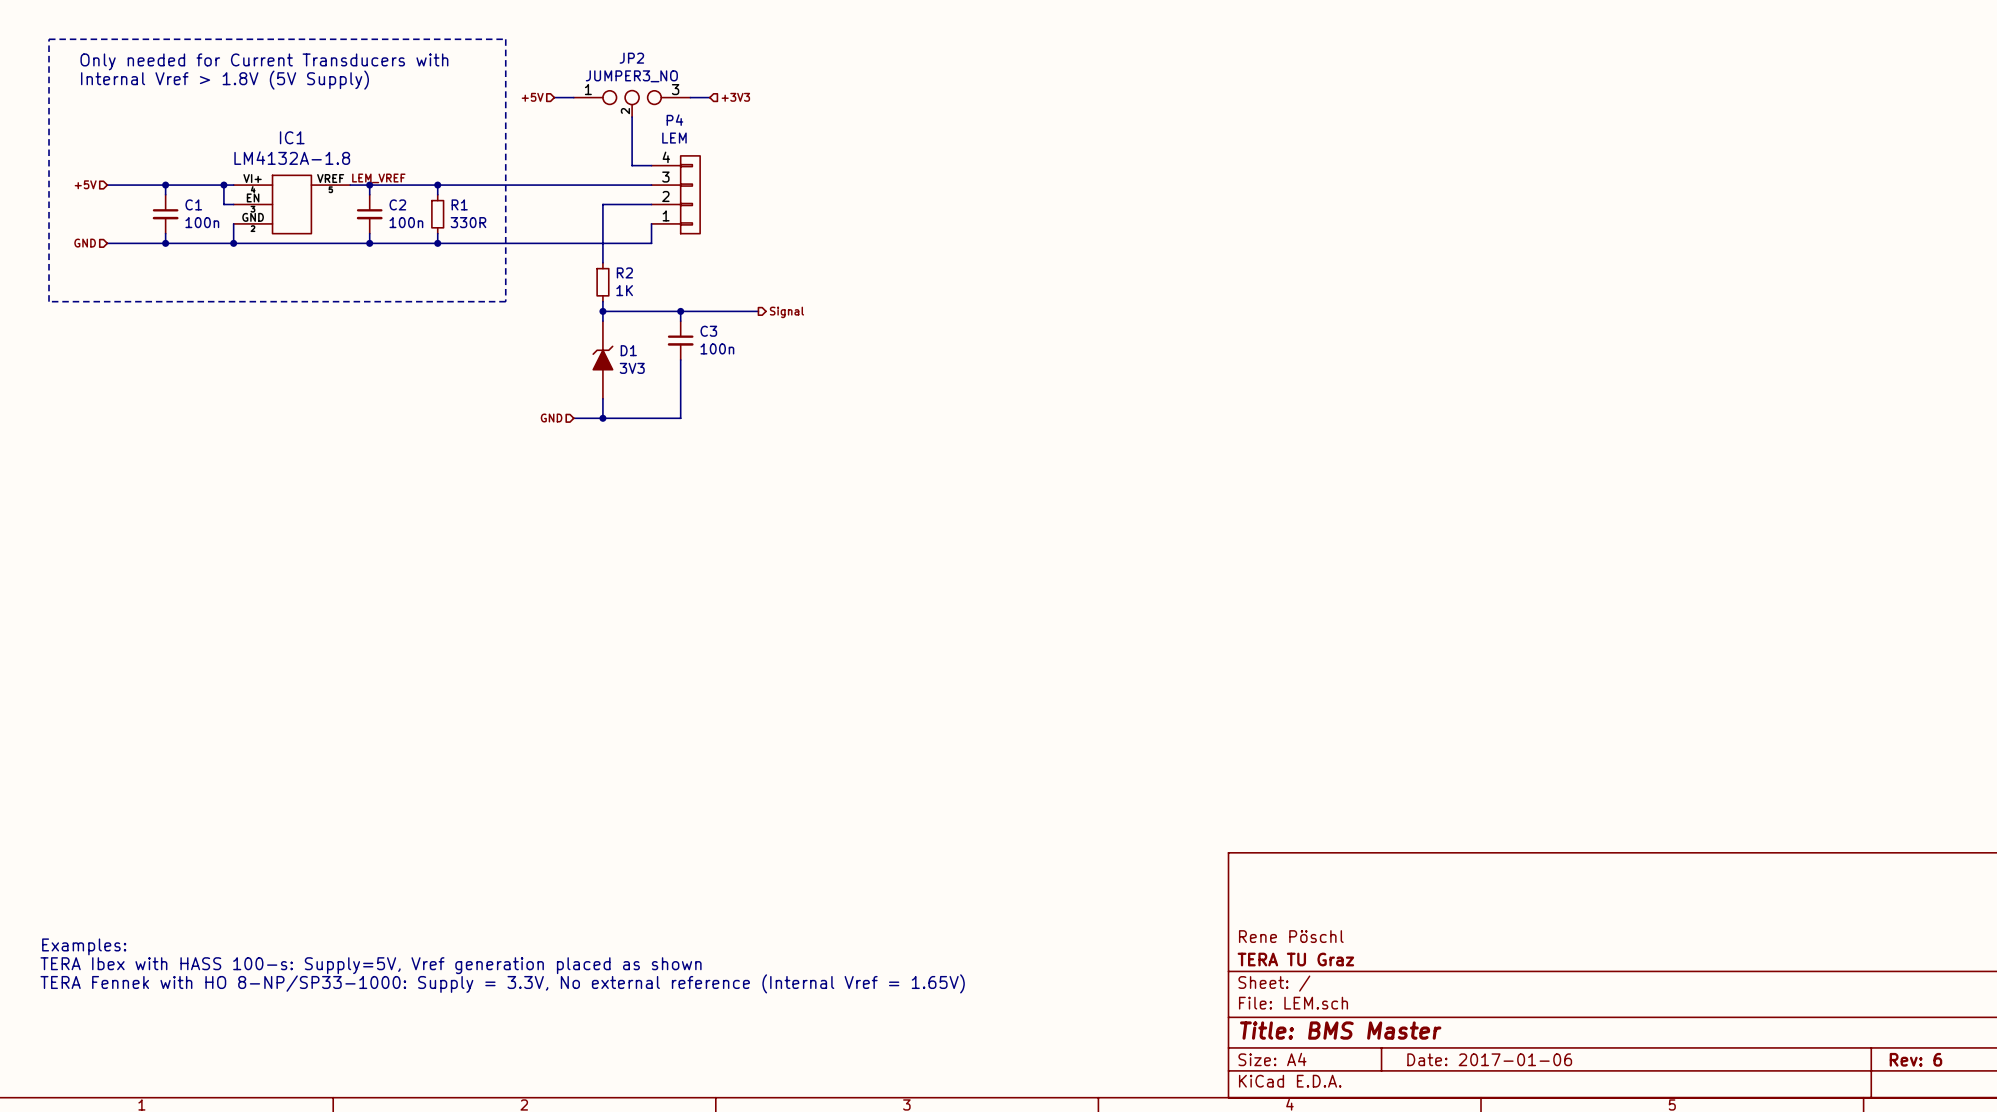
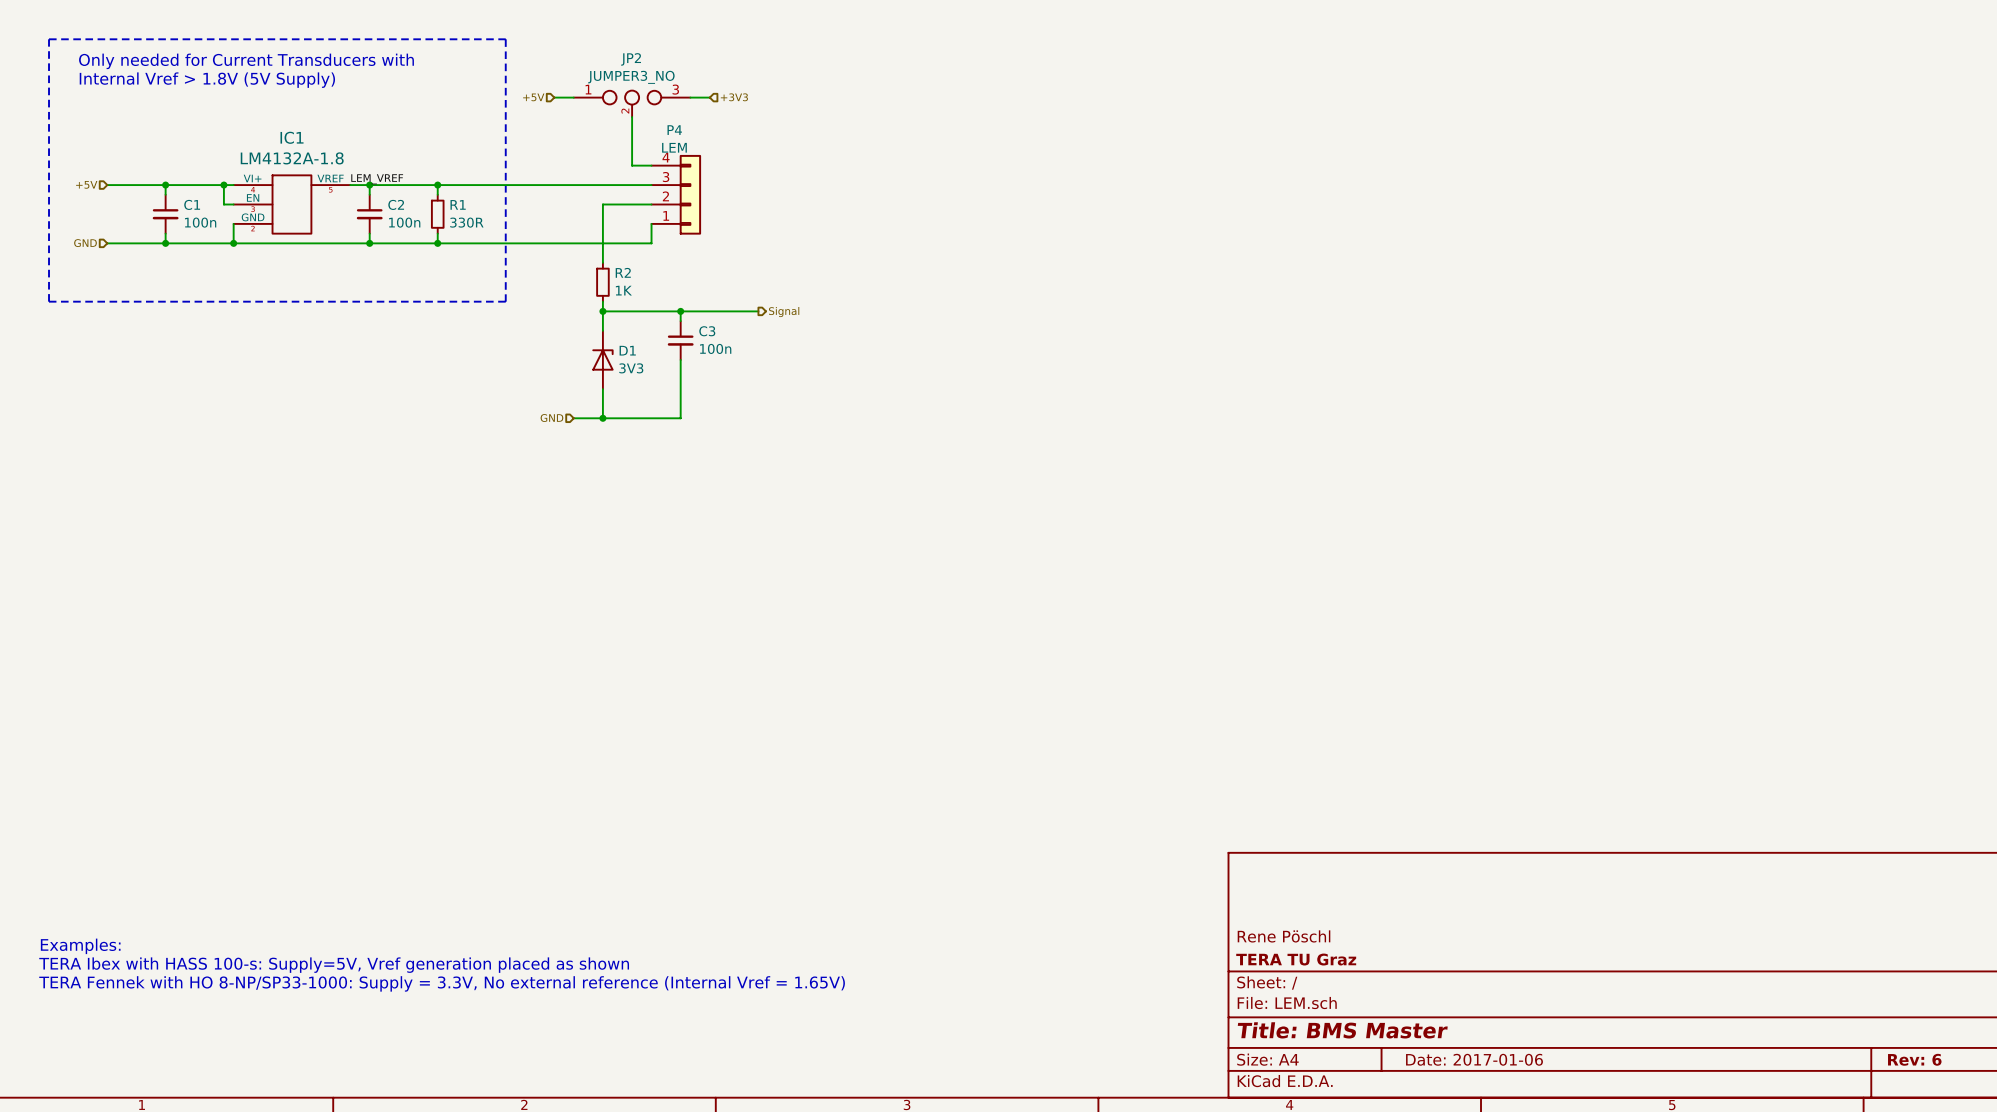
P4 symbol: [651, 155, 701, 234] -> [651, 154, 702, 235]
D1 symbol: [592, 321, 614, 399] -> [592, 330, 614, 390]

